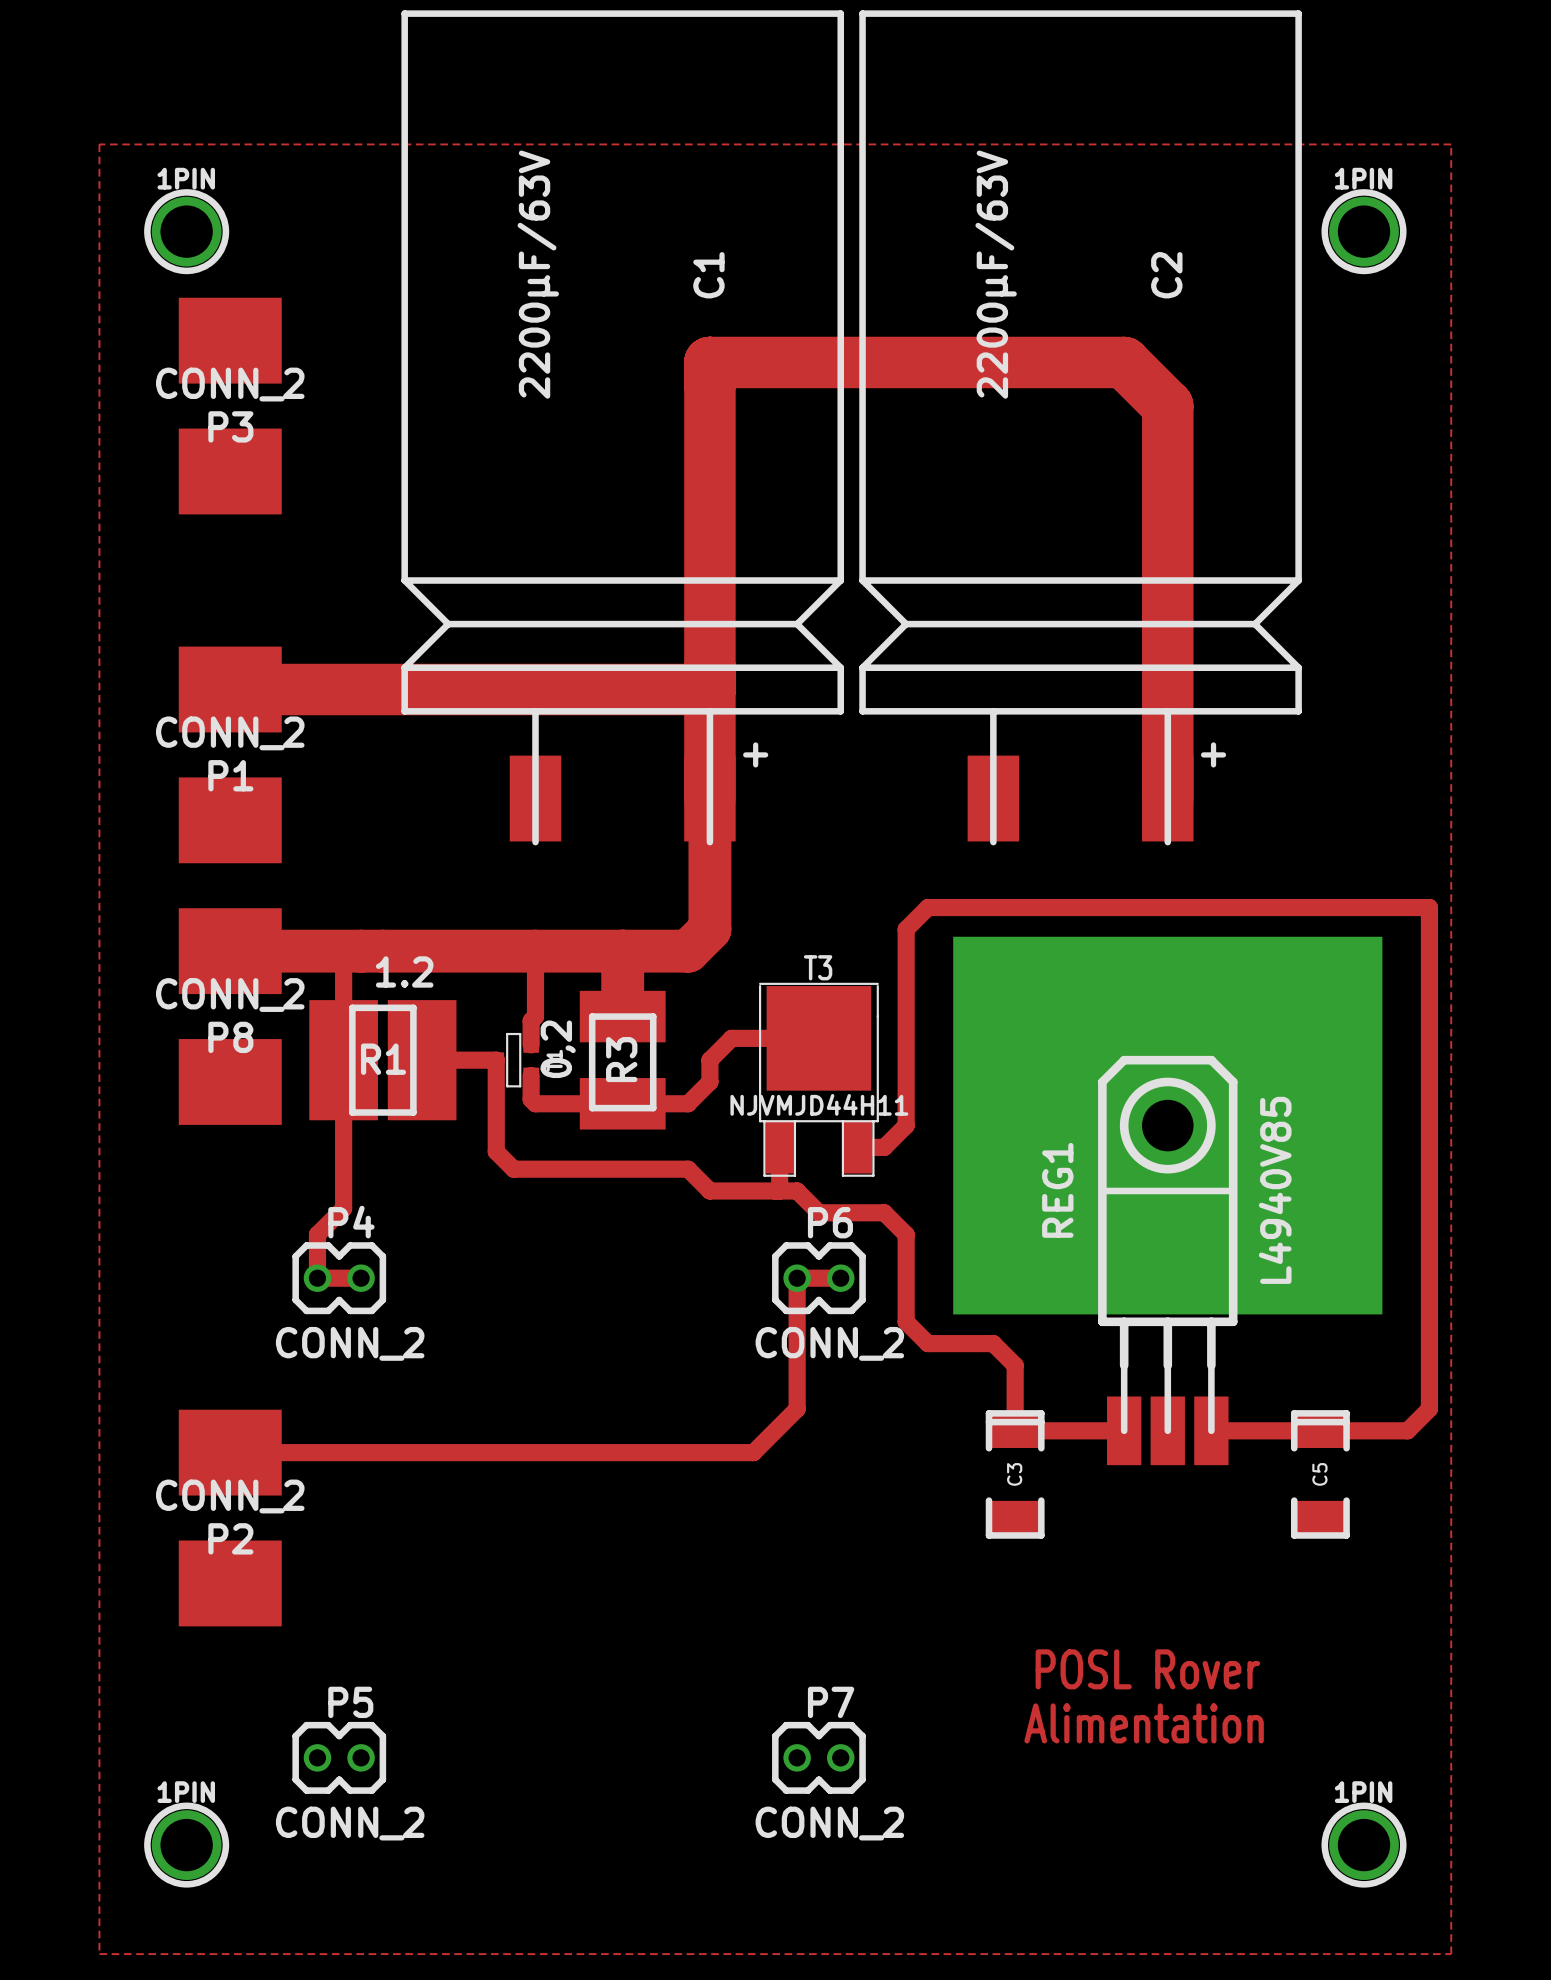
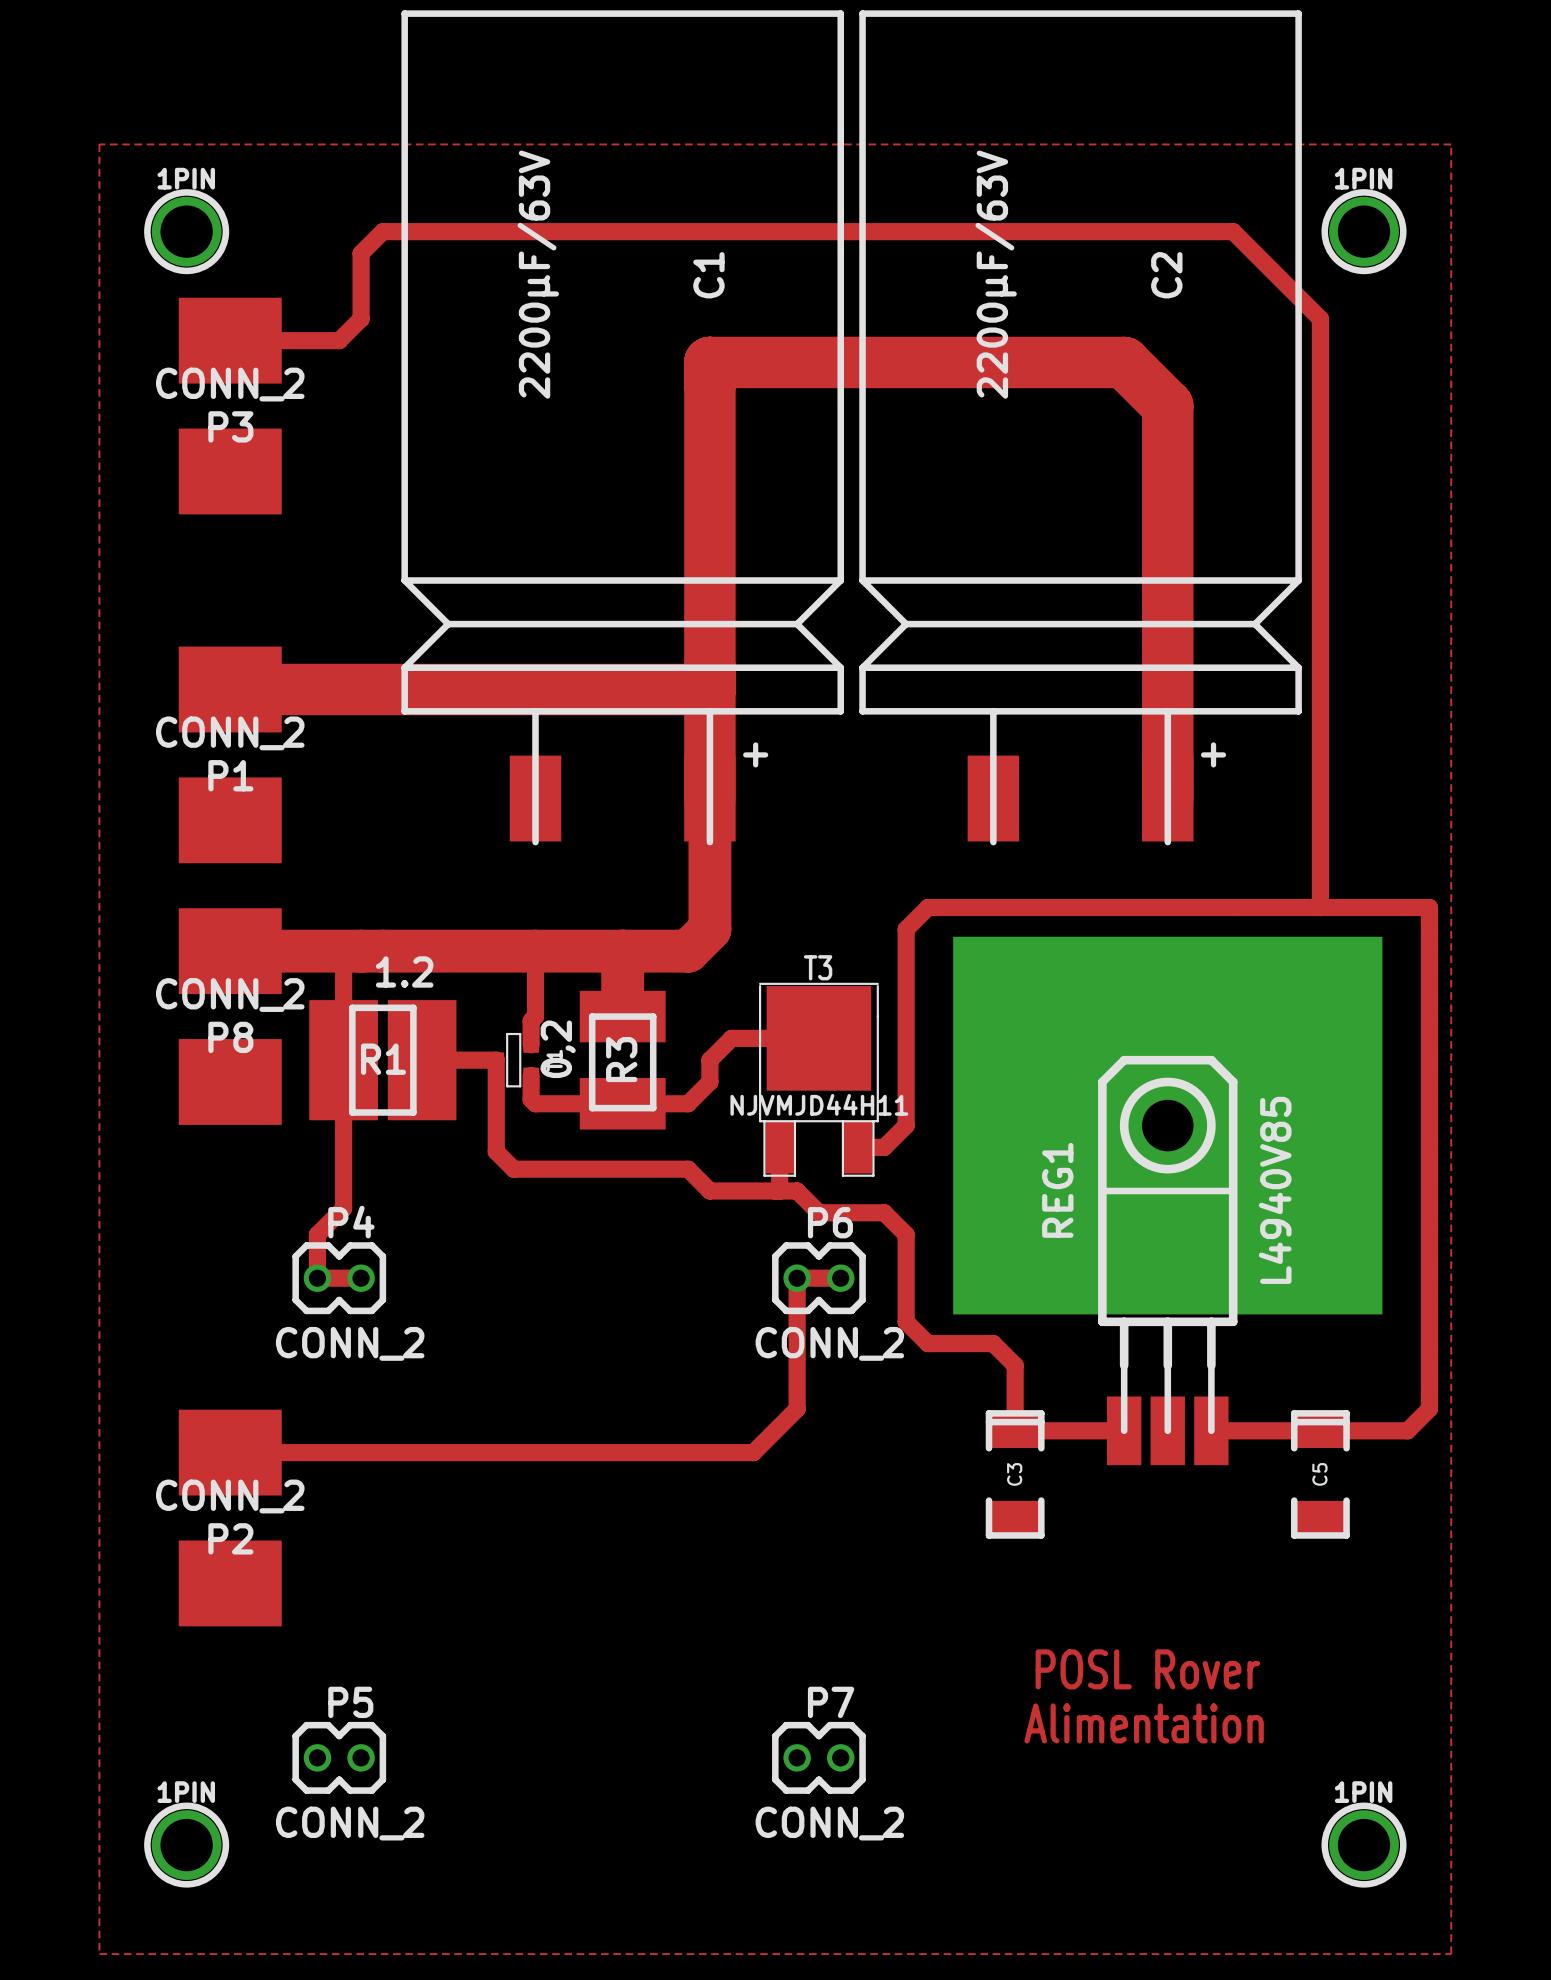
track: none -> (230, 340) (339, 340) (361, 318) (361, 253) (382, 231) (1233, 231) (1320, 318) (1320, 907)

